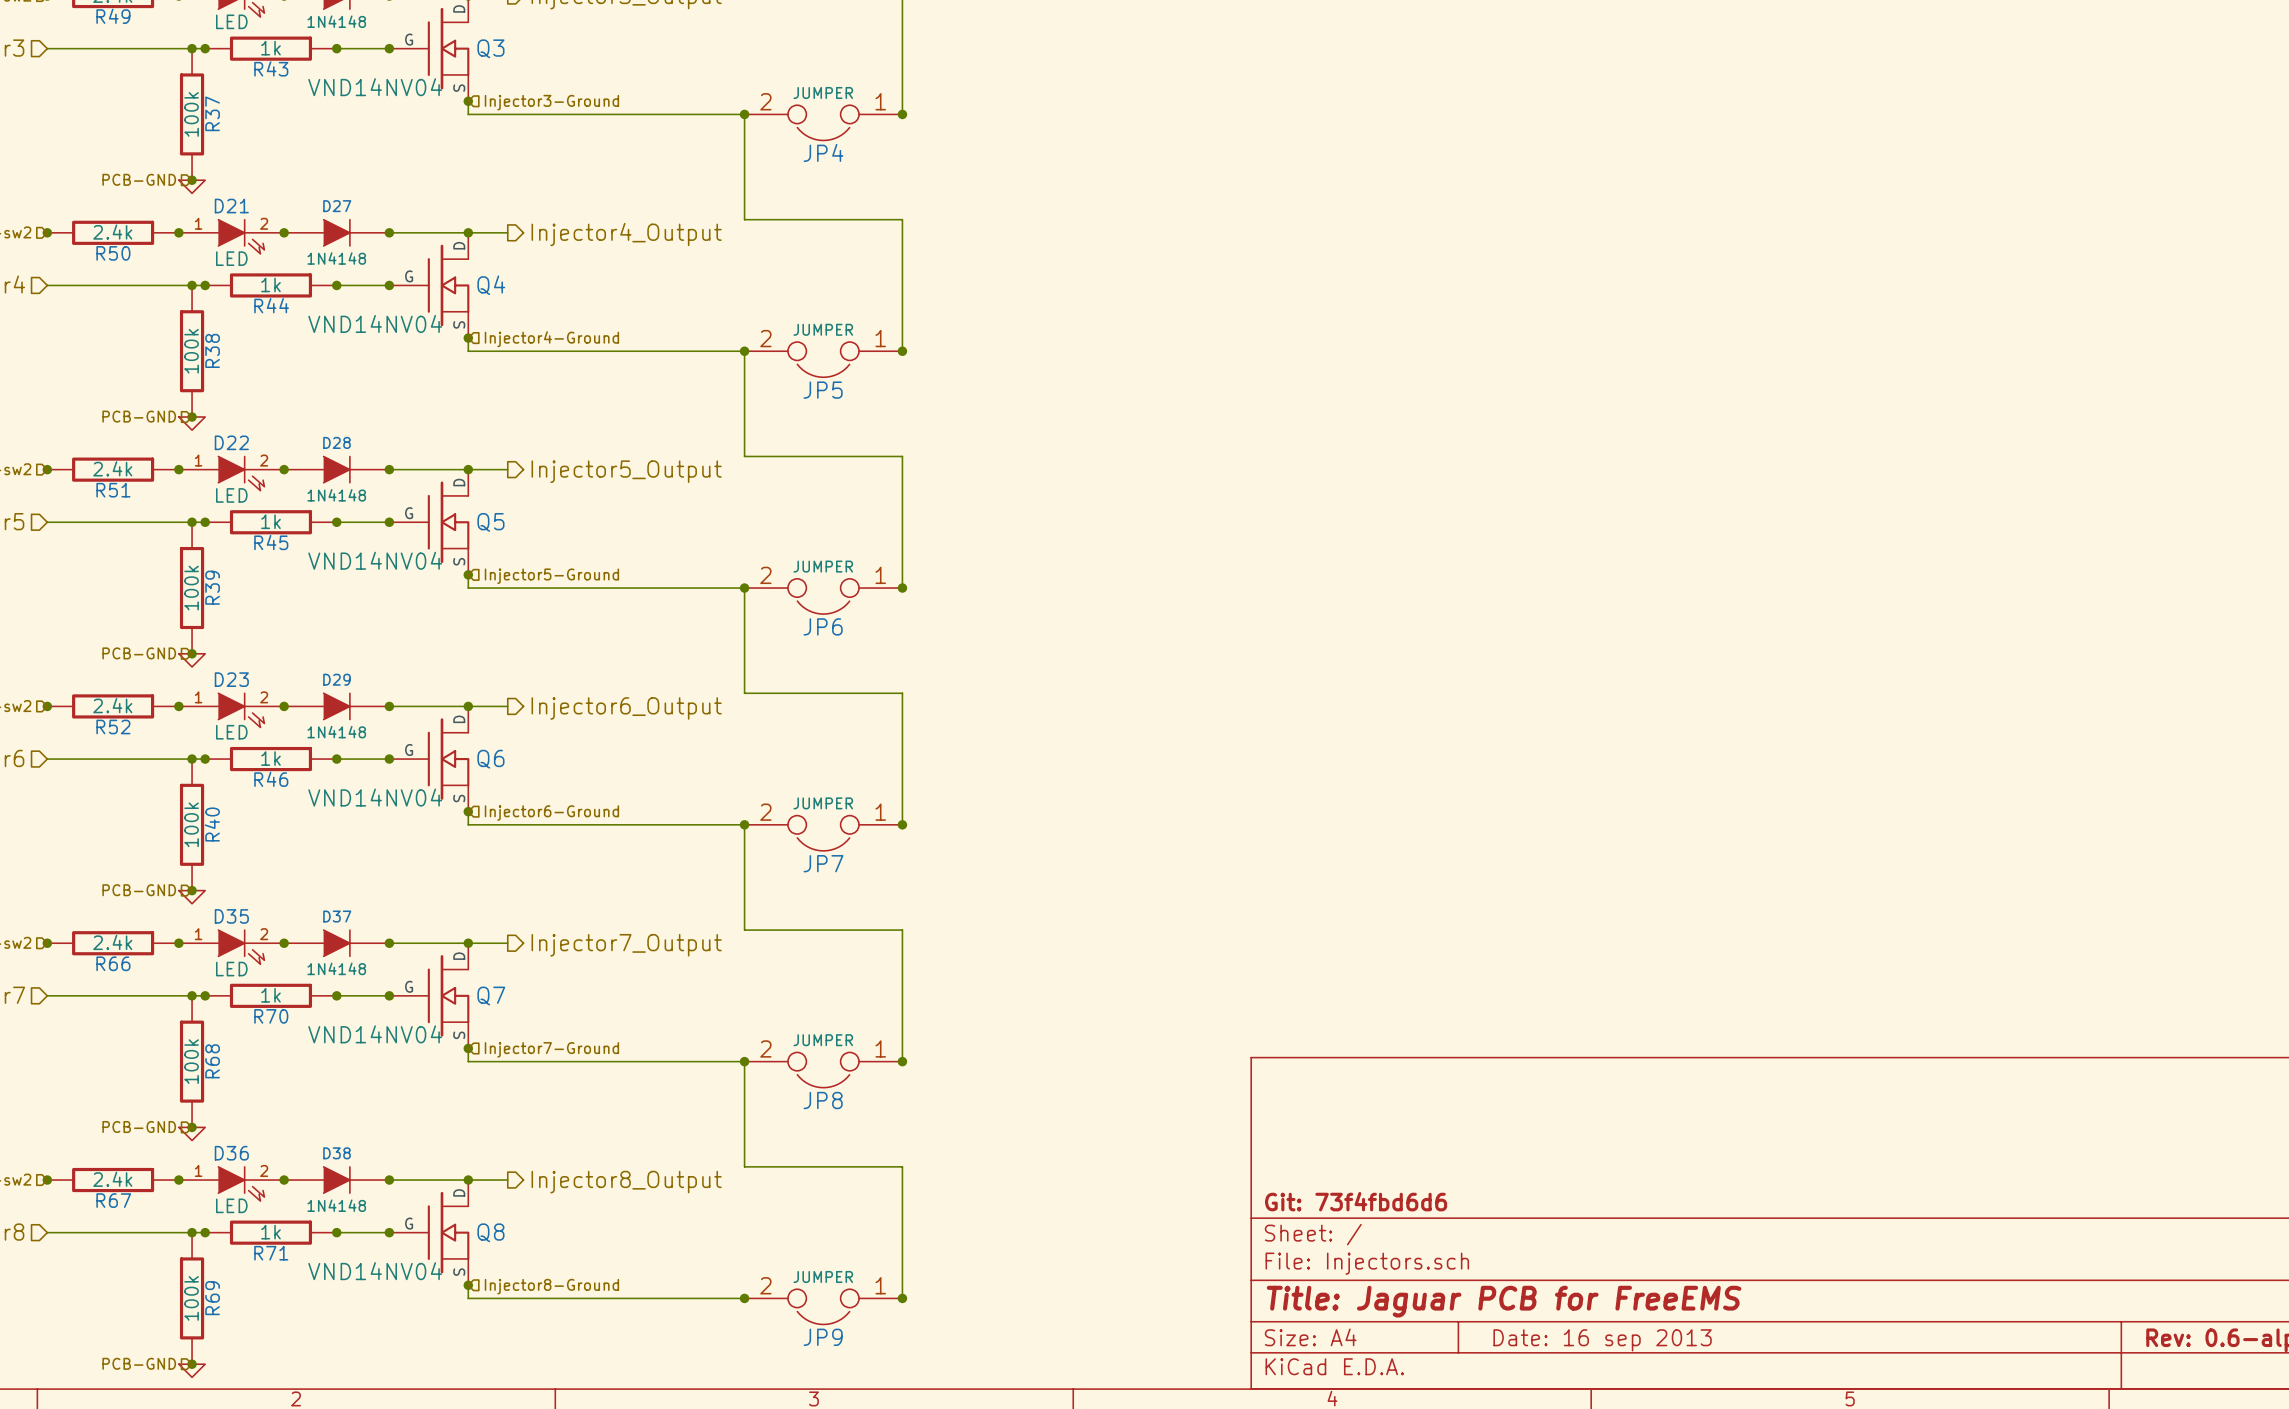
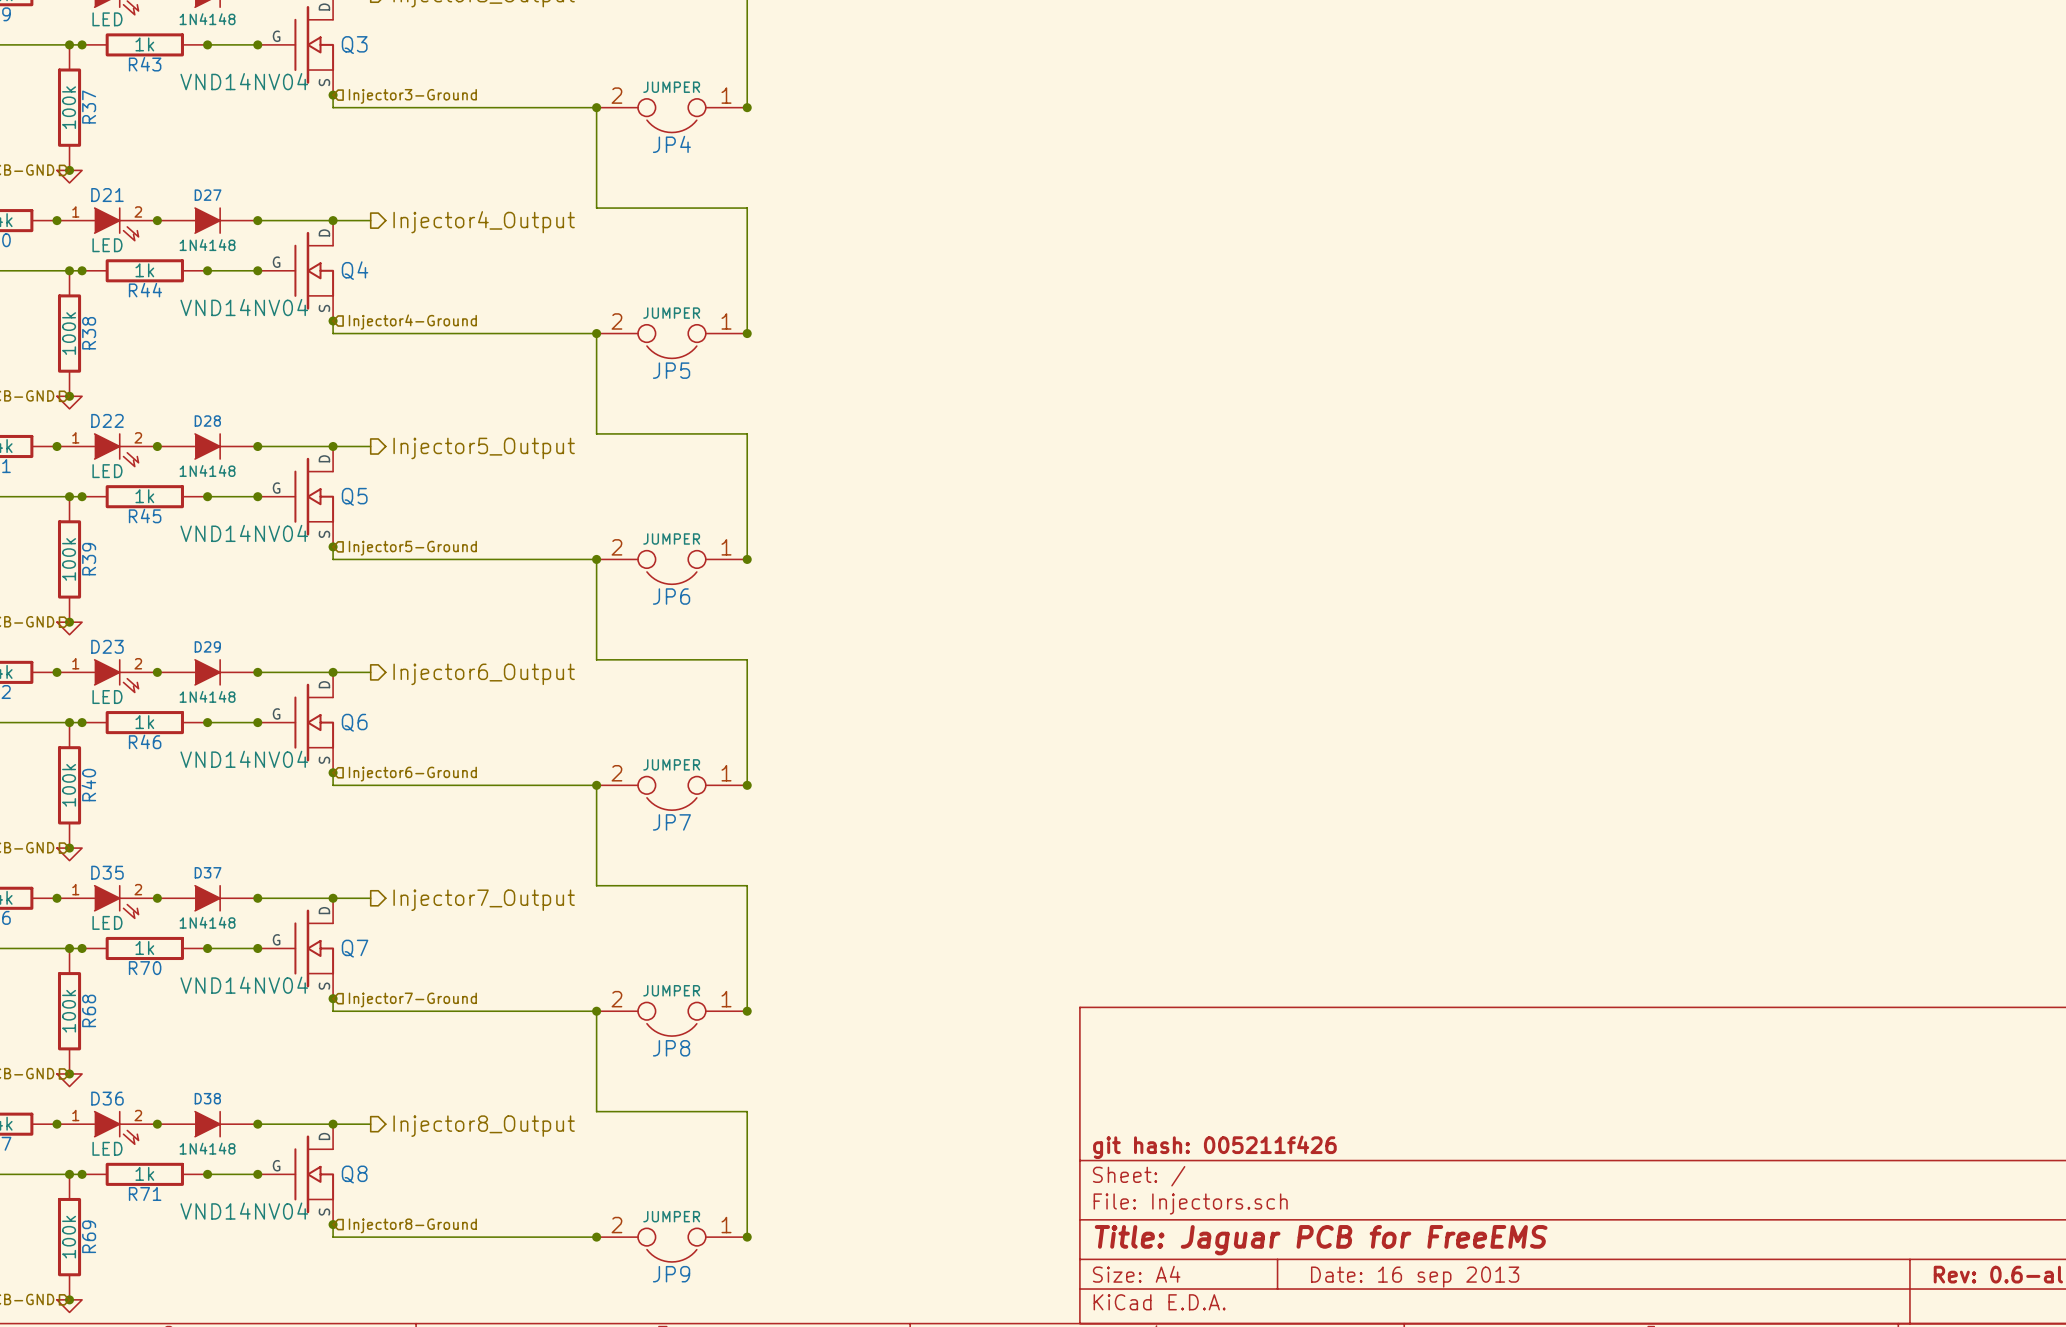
title block: Git: 73f4fbd6d6 (1356, 1201) -> git hash: 005211f426 (1214, 1147)

